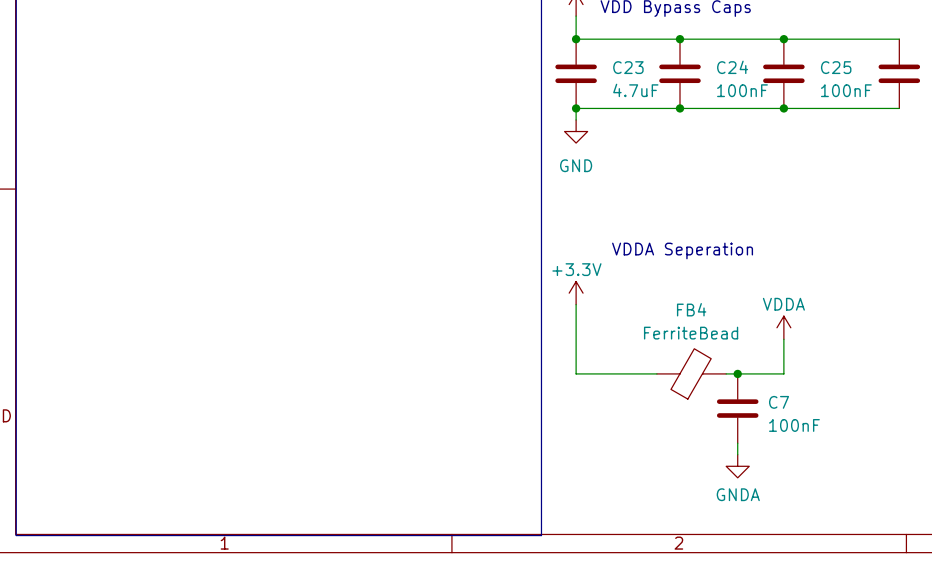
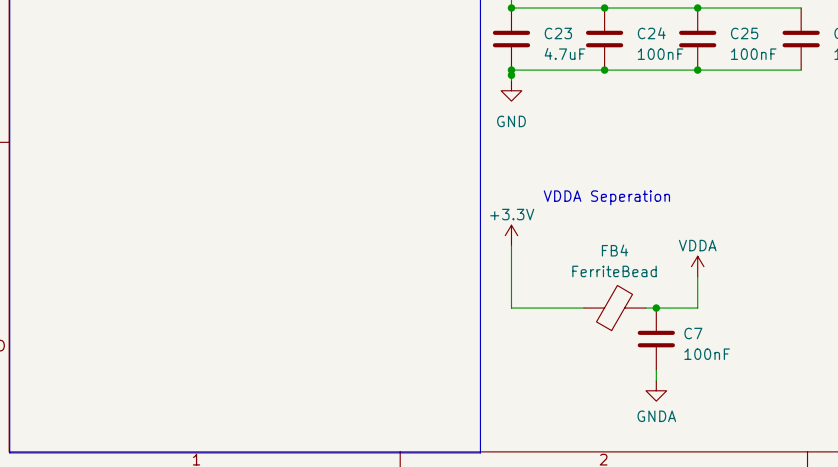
junction: none -> (511, 75)

